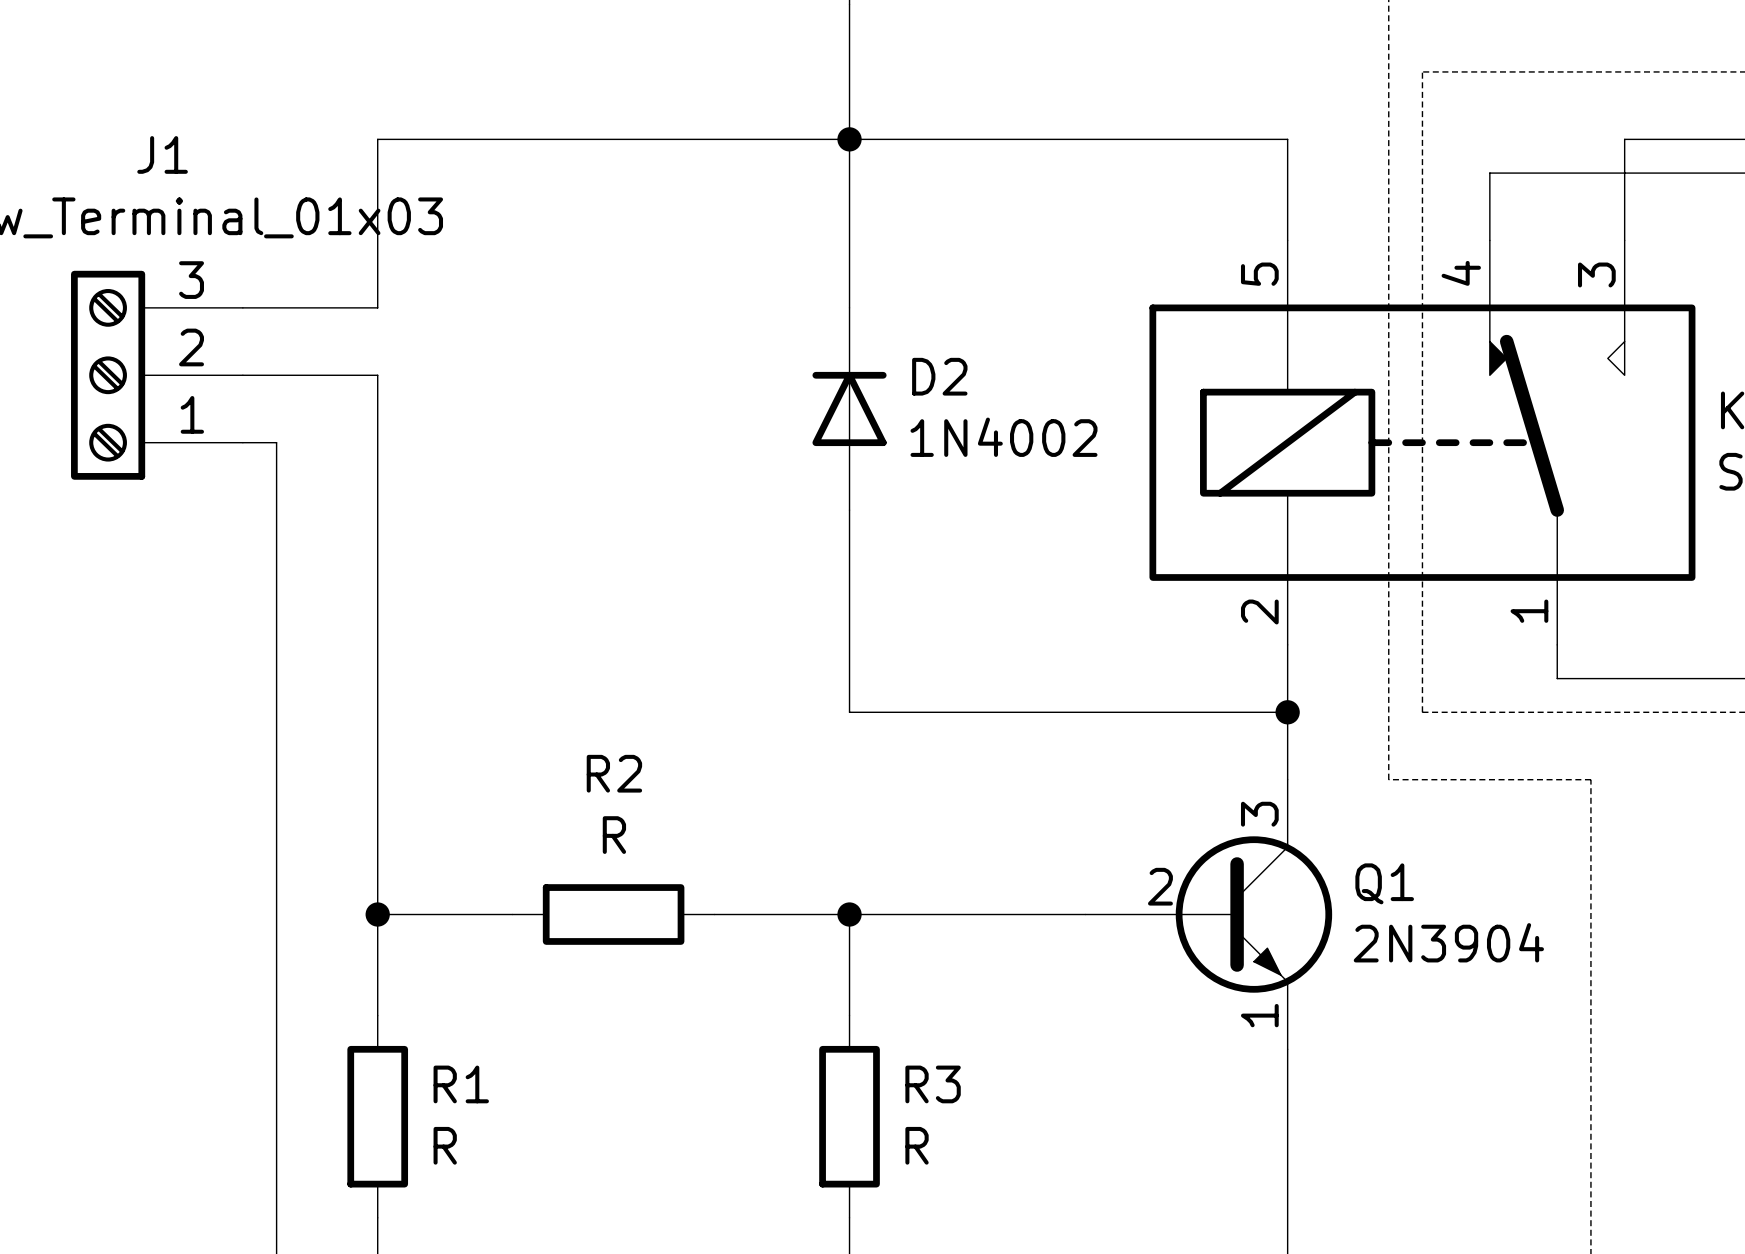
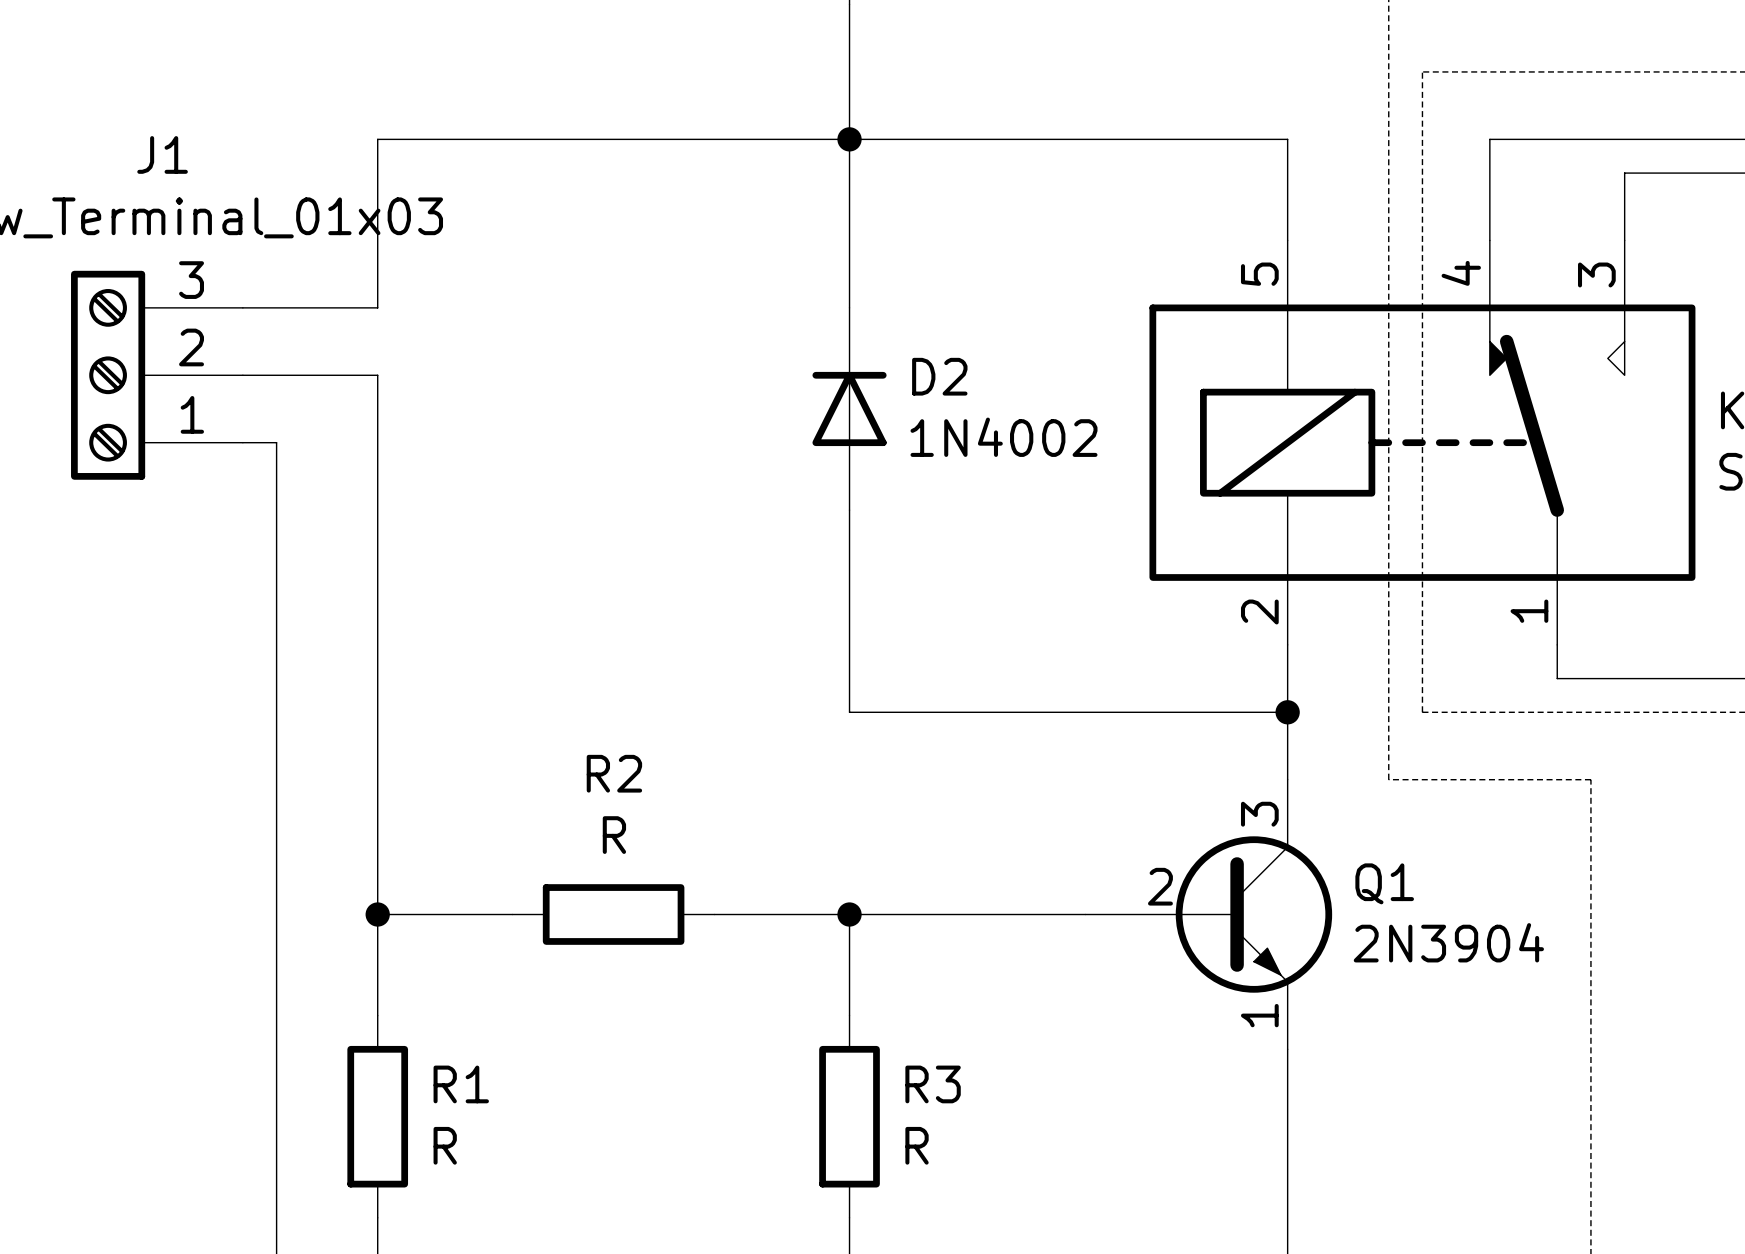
wire: (1624, 139) (1624, 173) (1489, 173) -> (1624, 139) (1489, 139) (1489, 173)

